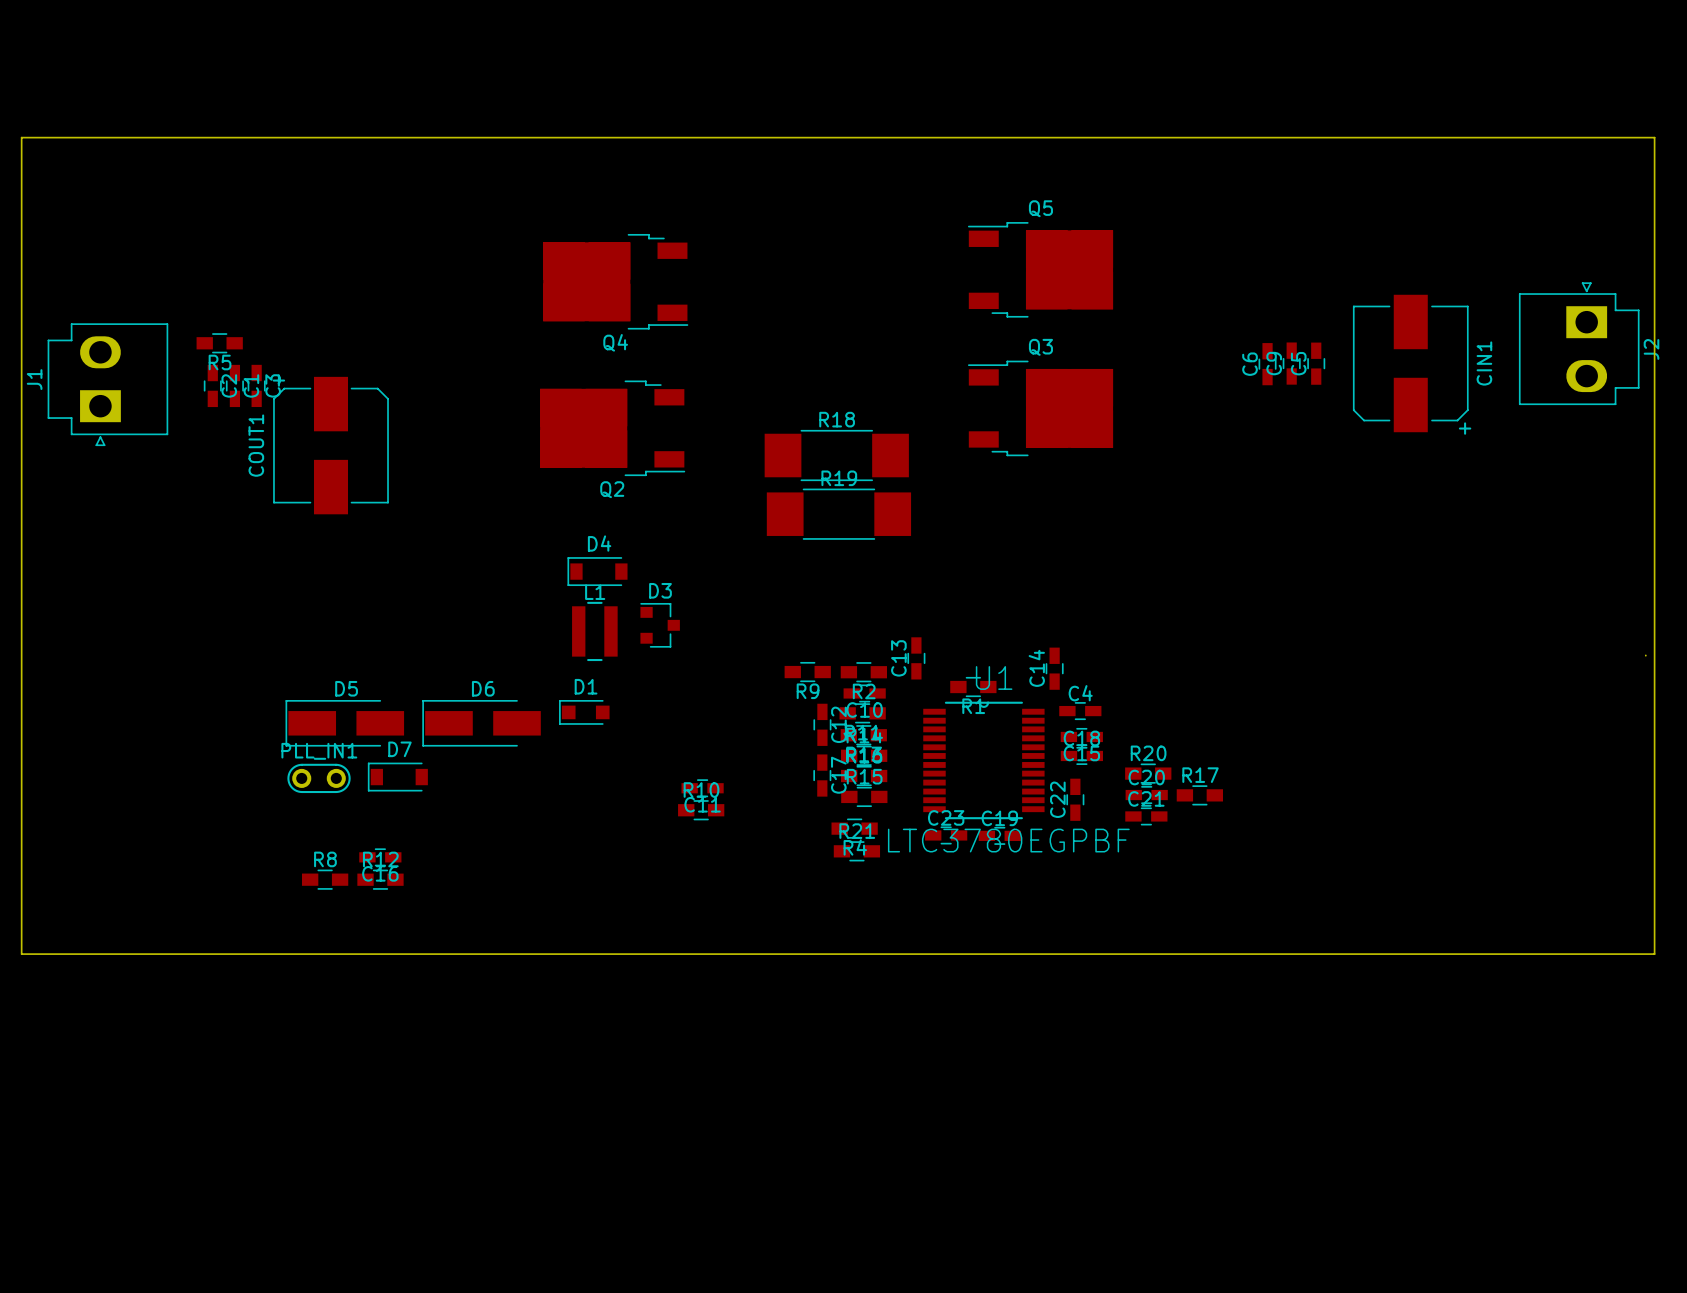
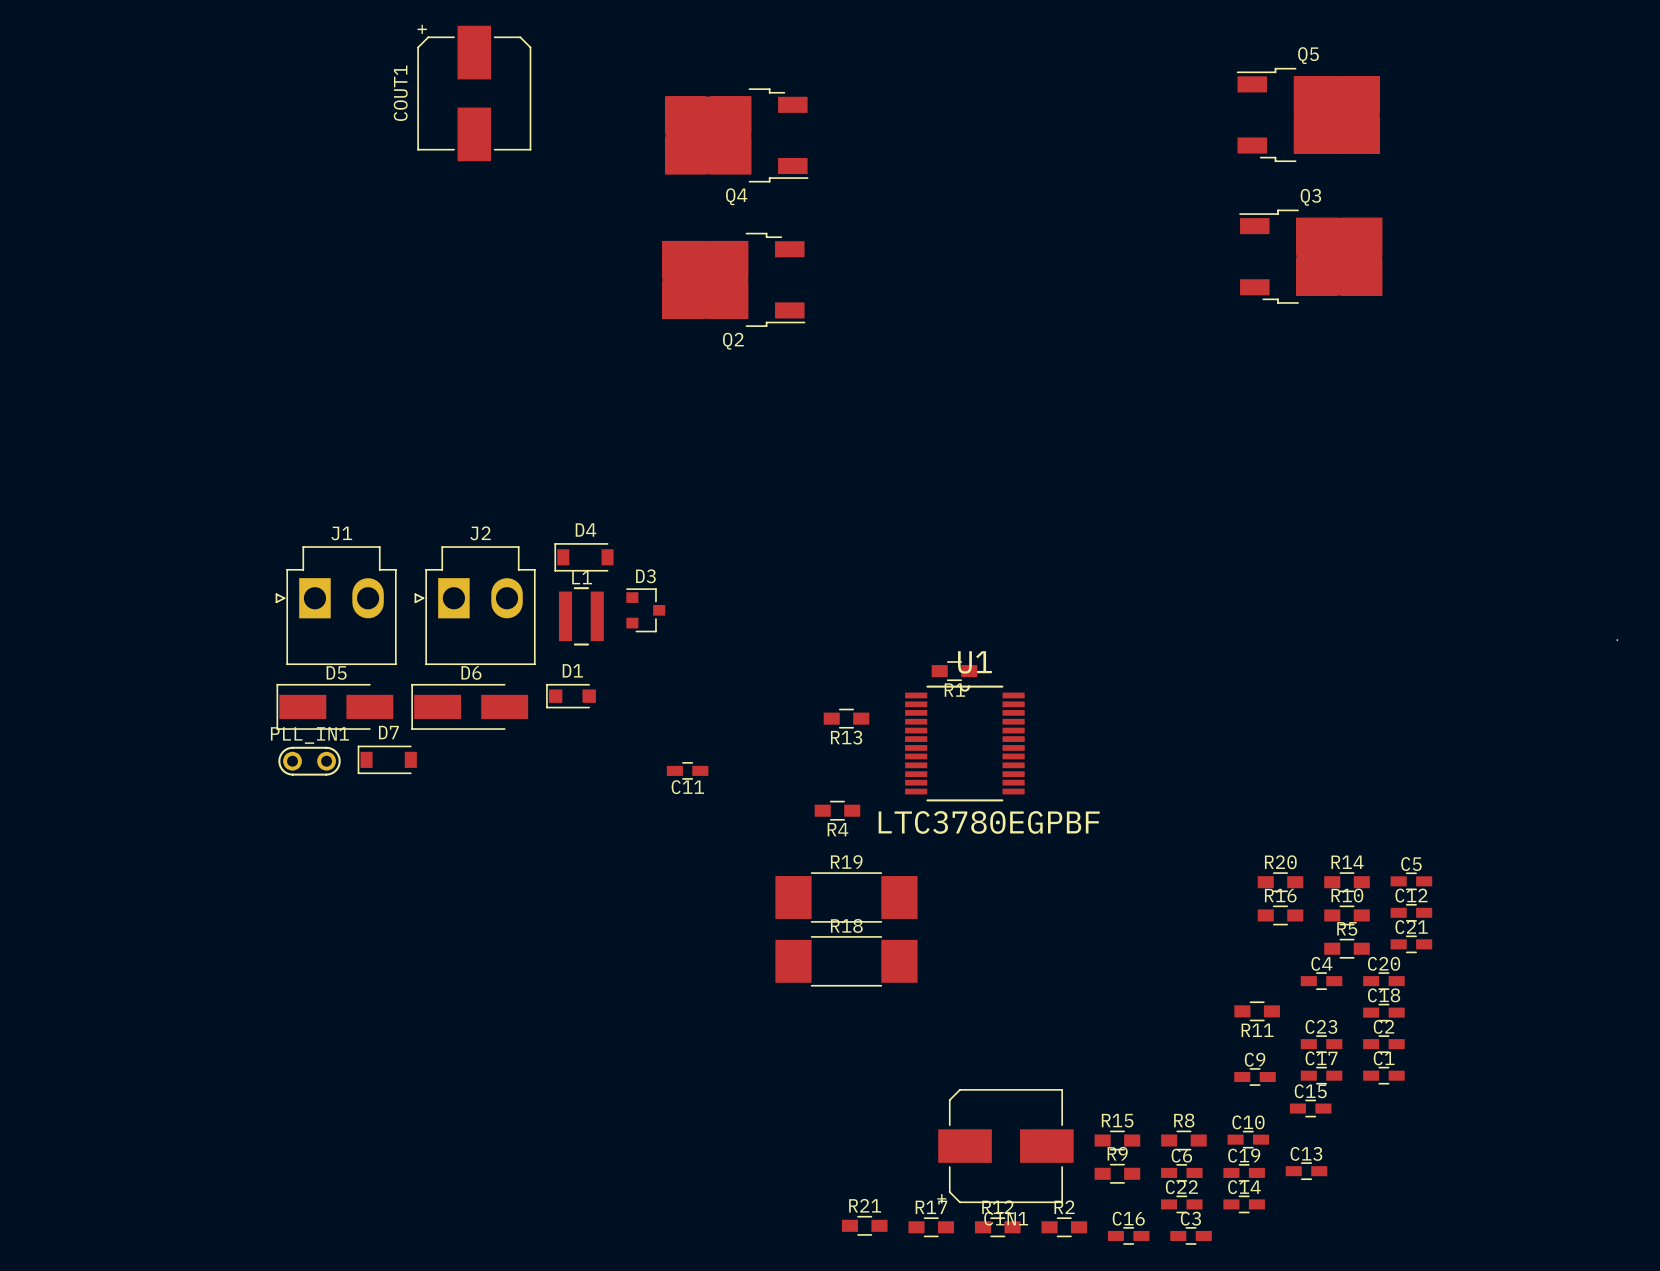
board edge: (21, 137) (21, 954) (1654, 954) (1654, 137) (21, 137) -> none
Q5 position: (1040, 269) -> (1308, 114)
Q4 position: (615, 281) -> (736, 135)
R5 position: (219, 343) -> (1347, 948)
J2 rotation: 0° (1579, 343) -> 90° counterclockwise (475, 605)
J2 position: (1579, 343) -> (475, 605)
R5 name position: R5 (220, 362) -> R5 (1347, 928)
C9 rotation: 0° (1291, 363) -> 90° clockwise (1255, 1077)
C9 position: (1291, 363) -> (1255, 1077)
C5 rotation: 0° (1316, 363) -> 90° clockwise (1411, 881)
C5 position: (1316, 363) -> (1411, 881)
CIN1 rotation: 0° (1410, 363) -> 90° clockwise (1005, 1146)
CIN1 position: (1410, 363) -> (1005, 1146)
C6 rotation: 0° (1267, 364) -> 90° clockwise (1181, 1172)
C6 position: (1267, 364) -> (1181, 1172)
J1 rotation: 0° (107, 384) -> 90° clockwise (336, 605)
J1 position: (107, 384) -> (336, 605)
C2 rotation: 0° (212, 385) -> 90° clockwise (1383, 1044)
C2 position: (212, 385) -> (1383, 1044)
C1 rotation: 0° (234, 385) -> 90° clockwise (1383, 1075)
C1 position: (234, 385) -> (1383, 1075)
C3 rotation: 0° (256, 385) -> 90° clockwise (1191, 1235)
C3 position: (256, 385) -> (1191, 1235)
Q3 position: (1040, 408) -> (1310, 256)
Q2 position: (612, 428) -> (733, 279)
COUT1 position: (330, 445) -> (474, 93)
R18 position: (836, 455) -> (846, 961)
R19 position: (838, 514) -> (846, 897)
C13 rotation: 0° (916, 658) -> 90° clockwise (1306, 1171)
C13 position: (916, 658) -> (1306, 1171)
C14 rotation: 0° (1054, 668) -> 90° clockwise (1244, 1204)
C14 position: (1054, 668) -> (1244, 1204)
R9 position: (807, 672) -> (1117, 1173)
R2 position: (863, 672) -> (1064, 1227)
R9 name position: R9 (808, 691) -> R9 (1117, 1153)
R2 name position: R2 (864, 691) -> R2 (1064, 1207)
C10 position: (864, 693) -> (1248, 1139)
C10 name position: C10 (864, 709) -> C10 (1248, 1122)
C4 position: (1080, 711) -> (1321, 981)
R11 position: (862, 713) -> (1257, 1011)
C12 rotation: 0° (822, 724) -> 90° clockwise (1411, 912)
C12 position: (822, 724) -> (1411, 912)
C15 position: (1081, 736) -> (1310, 1108)
C15 name position: C15 (1081, 753) -> C15 (1310, 1091)
R14 position: (864, 755) -> (1347, 882)
C18 position: (1081, 755) -> (1383, 1012)
R20 position: (1148, 773) -> (1280, 882)
C17 rotation: 0° (822, 775) -> 90° clockwise (1321, 1075)
C17 position: (822, 775) -> (1321, 1075)
R16 position: (864, 776) -> (1280, 915)
C20 position: (1146, 795) -> (1383, 981)
R17 position: (1199, 795) -> (931, 1227)
R15 position: (864, 796) -> (1117, 1140)
C22 rotation: 0° (1075, 799) -> 90° clockwise (1181, 1204)
C22 position: (1075, 799) -> (1181, 1204)
R10 position: (701, 810) -> (1347, 915)
C21 position: (1146, 816) -> (1411, 944)
C23 position: (946, 835) -> (1321, 1044)
C19 position: (999, 835) -> (1244, 1172)
R21 position: (856, 851) -> (864, 1225)
C16 position: (380, 857) -> (1128, 1235)
C16 name position: C16 (380, 873) -> C16 (1128, 1218)
R8 position: (325, 879) -> (1183, 1140)
R12 position: (380, 879) -> (997, 1227)

